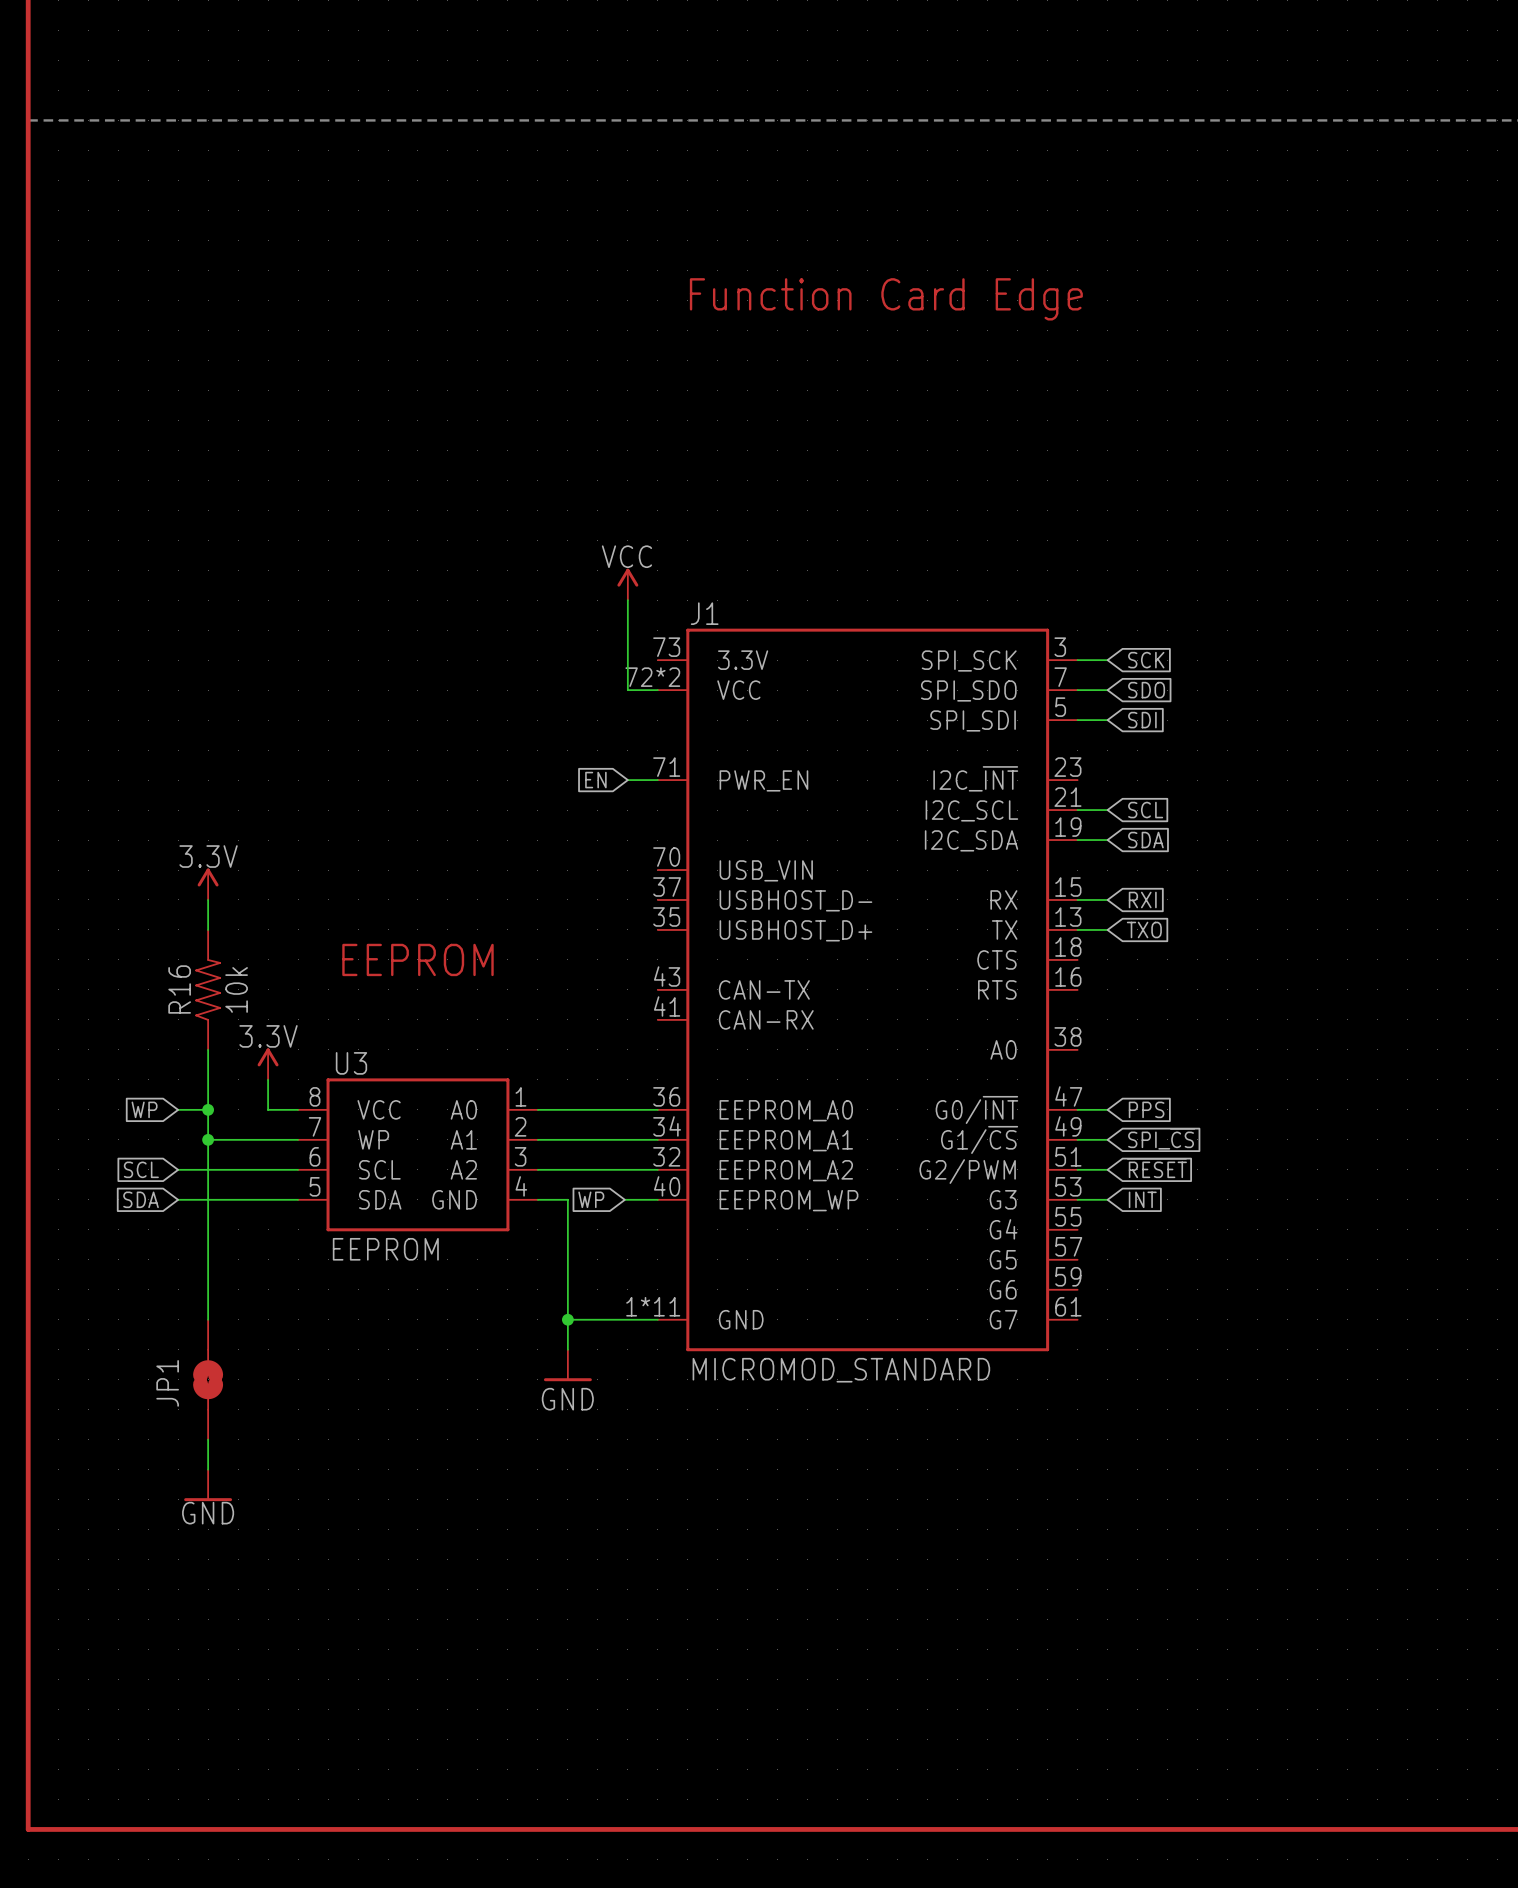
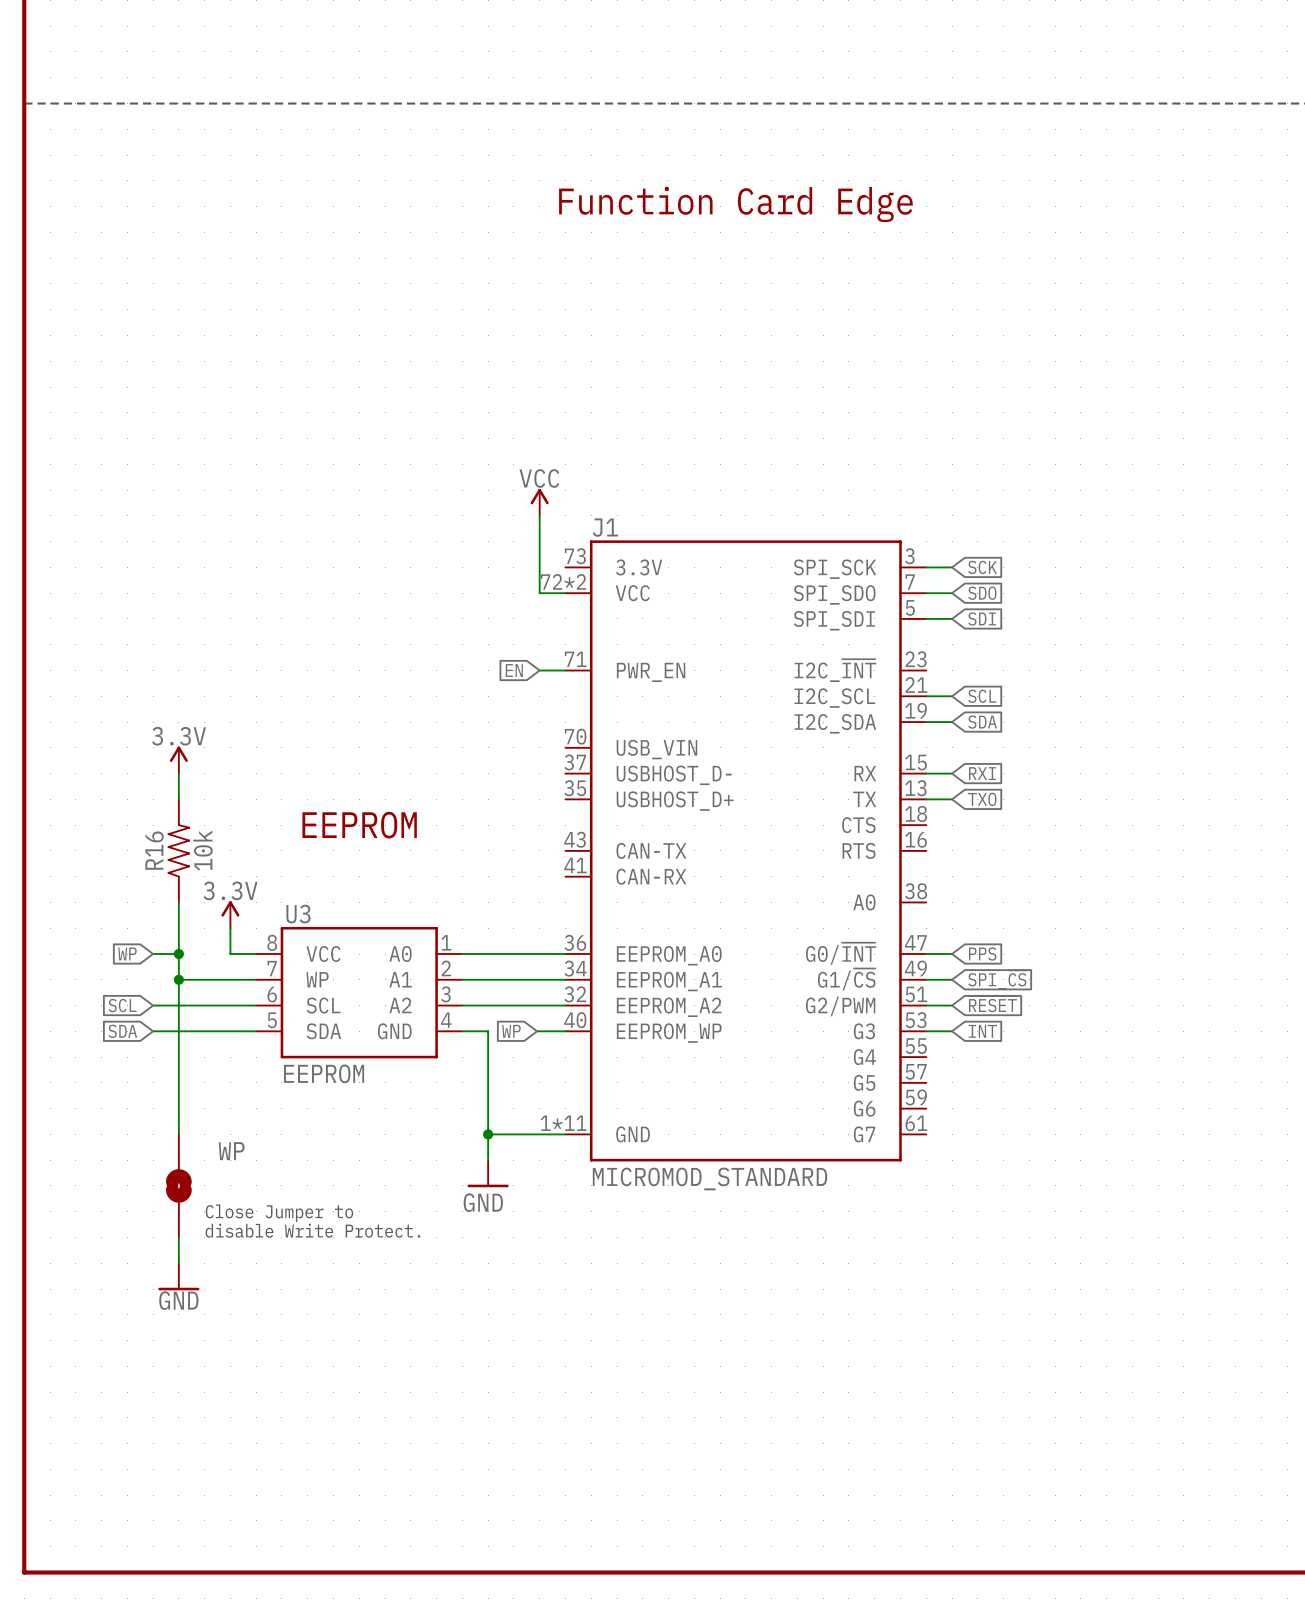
text position: Function Card Edge (886, 299) -> Function Card Edge (735, 204)
JP1 name: JP1 (167, 1383) -> WP (231, 1151)
text: none -> Close Jumper to (279, 1213)
text: none -> disable Write Protect. (312, 1230)

